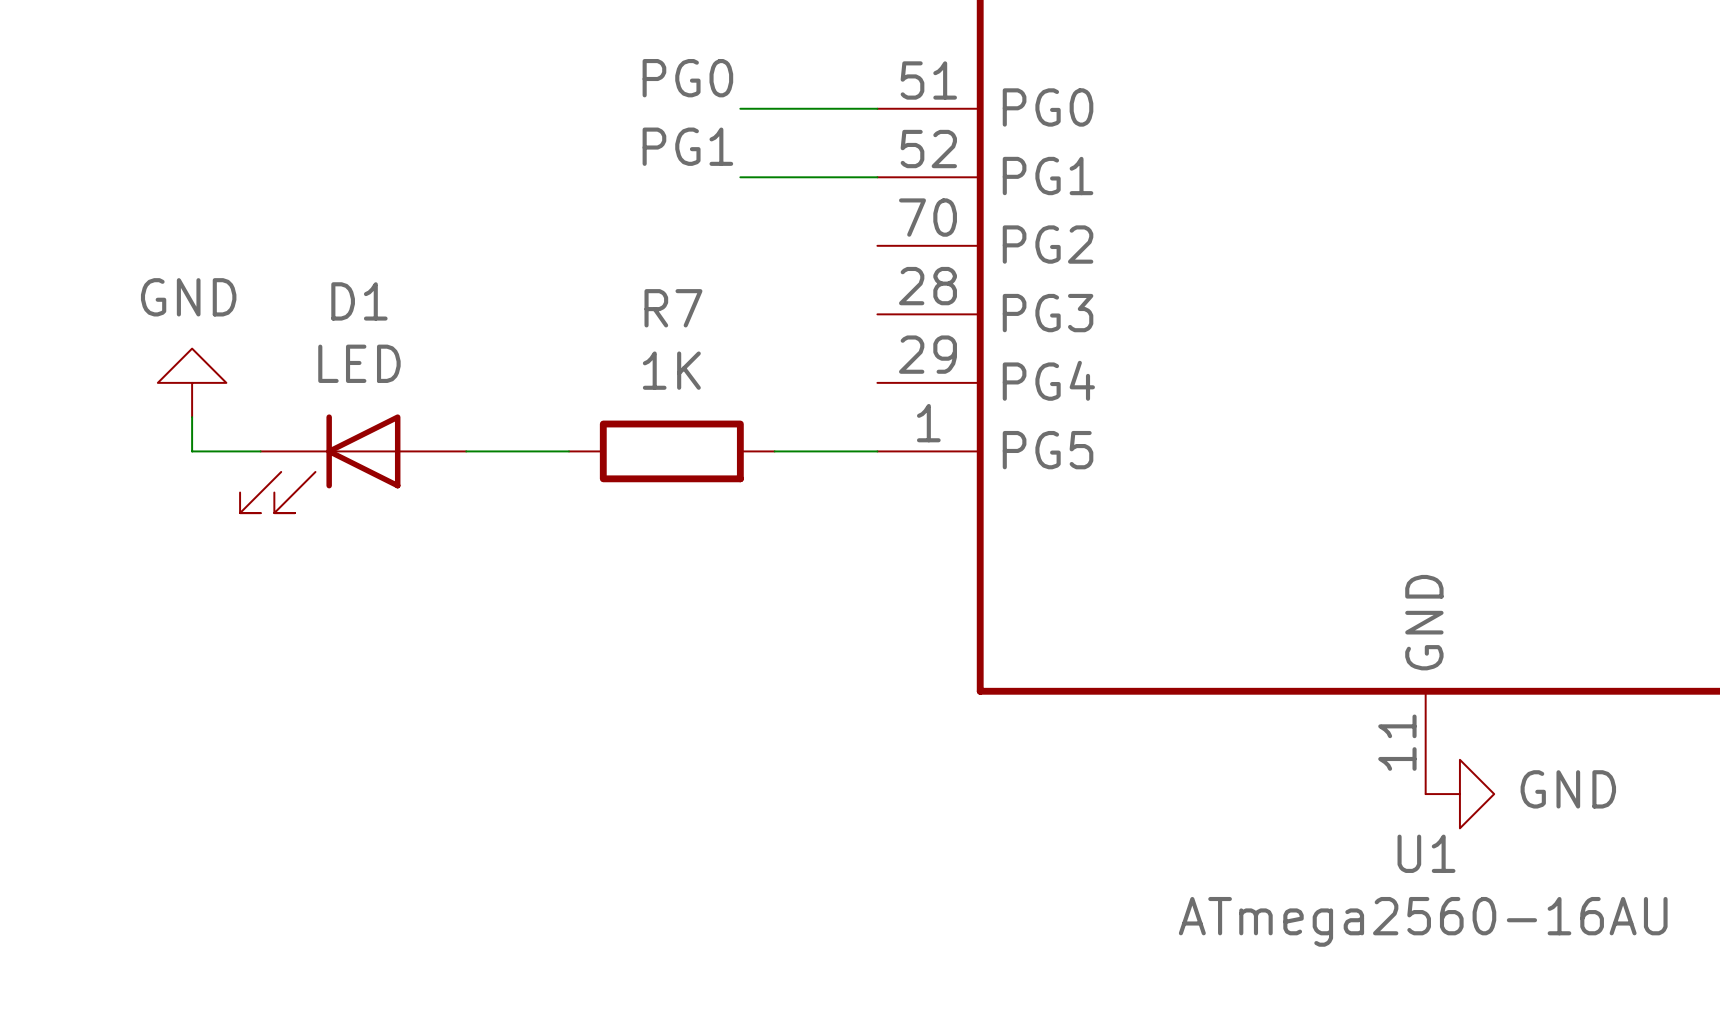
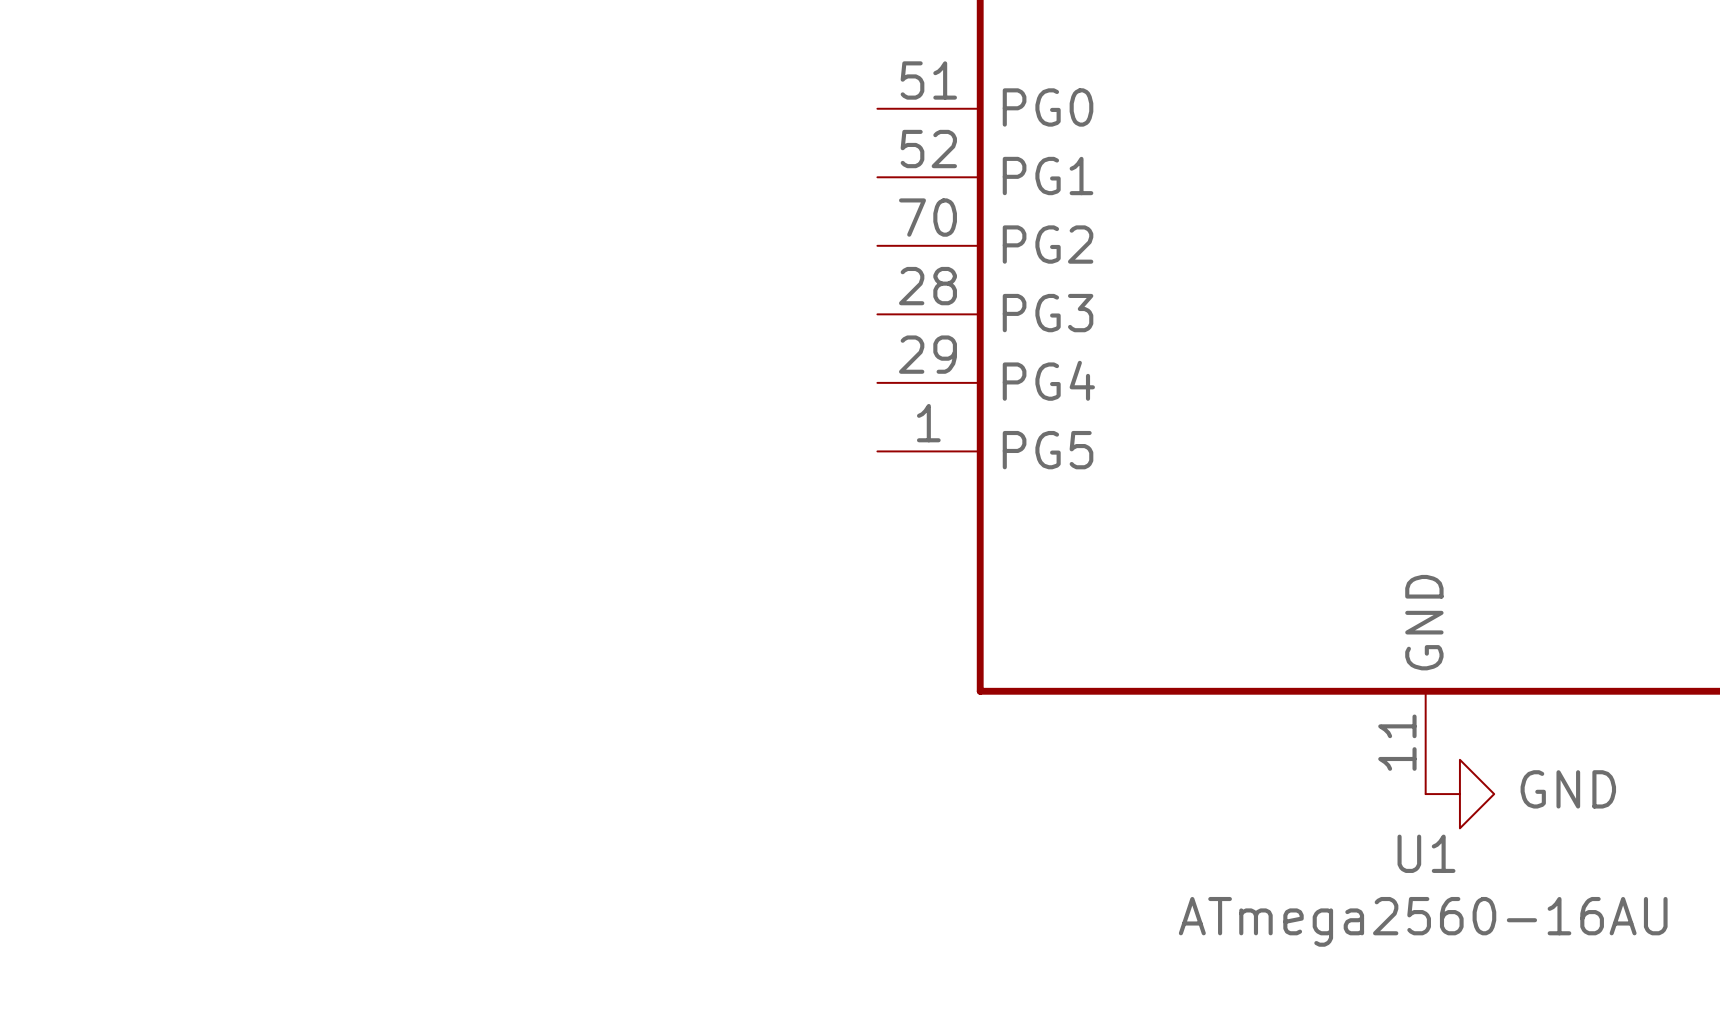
label: PG0 (687, 78) -> none
wire: (740, 108) (877, 108) -> none
label: PG1 (687, 146) -> none
wire: (740, 177) (877, 177) -> none
power symbol: GND (192, 382) -> none
wire: (192, 417) (192, 451) (260, 451) -> none
wire: (466, 451) (569, 451) -> none
R7: 1K (671, 451) -> none
wire: (774, 451) (877, 451) -> none
D1: LED (353, 463) -> none

